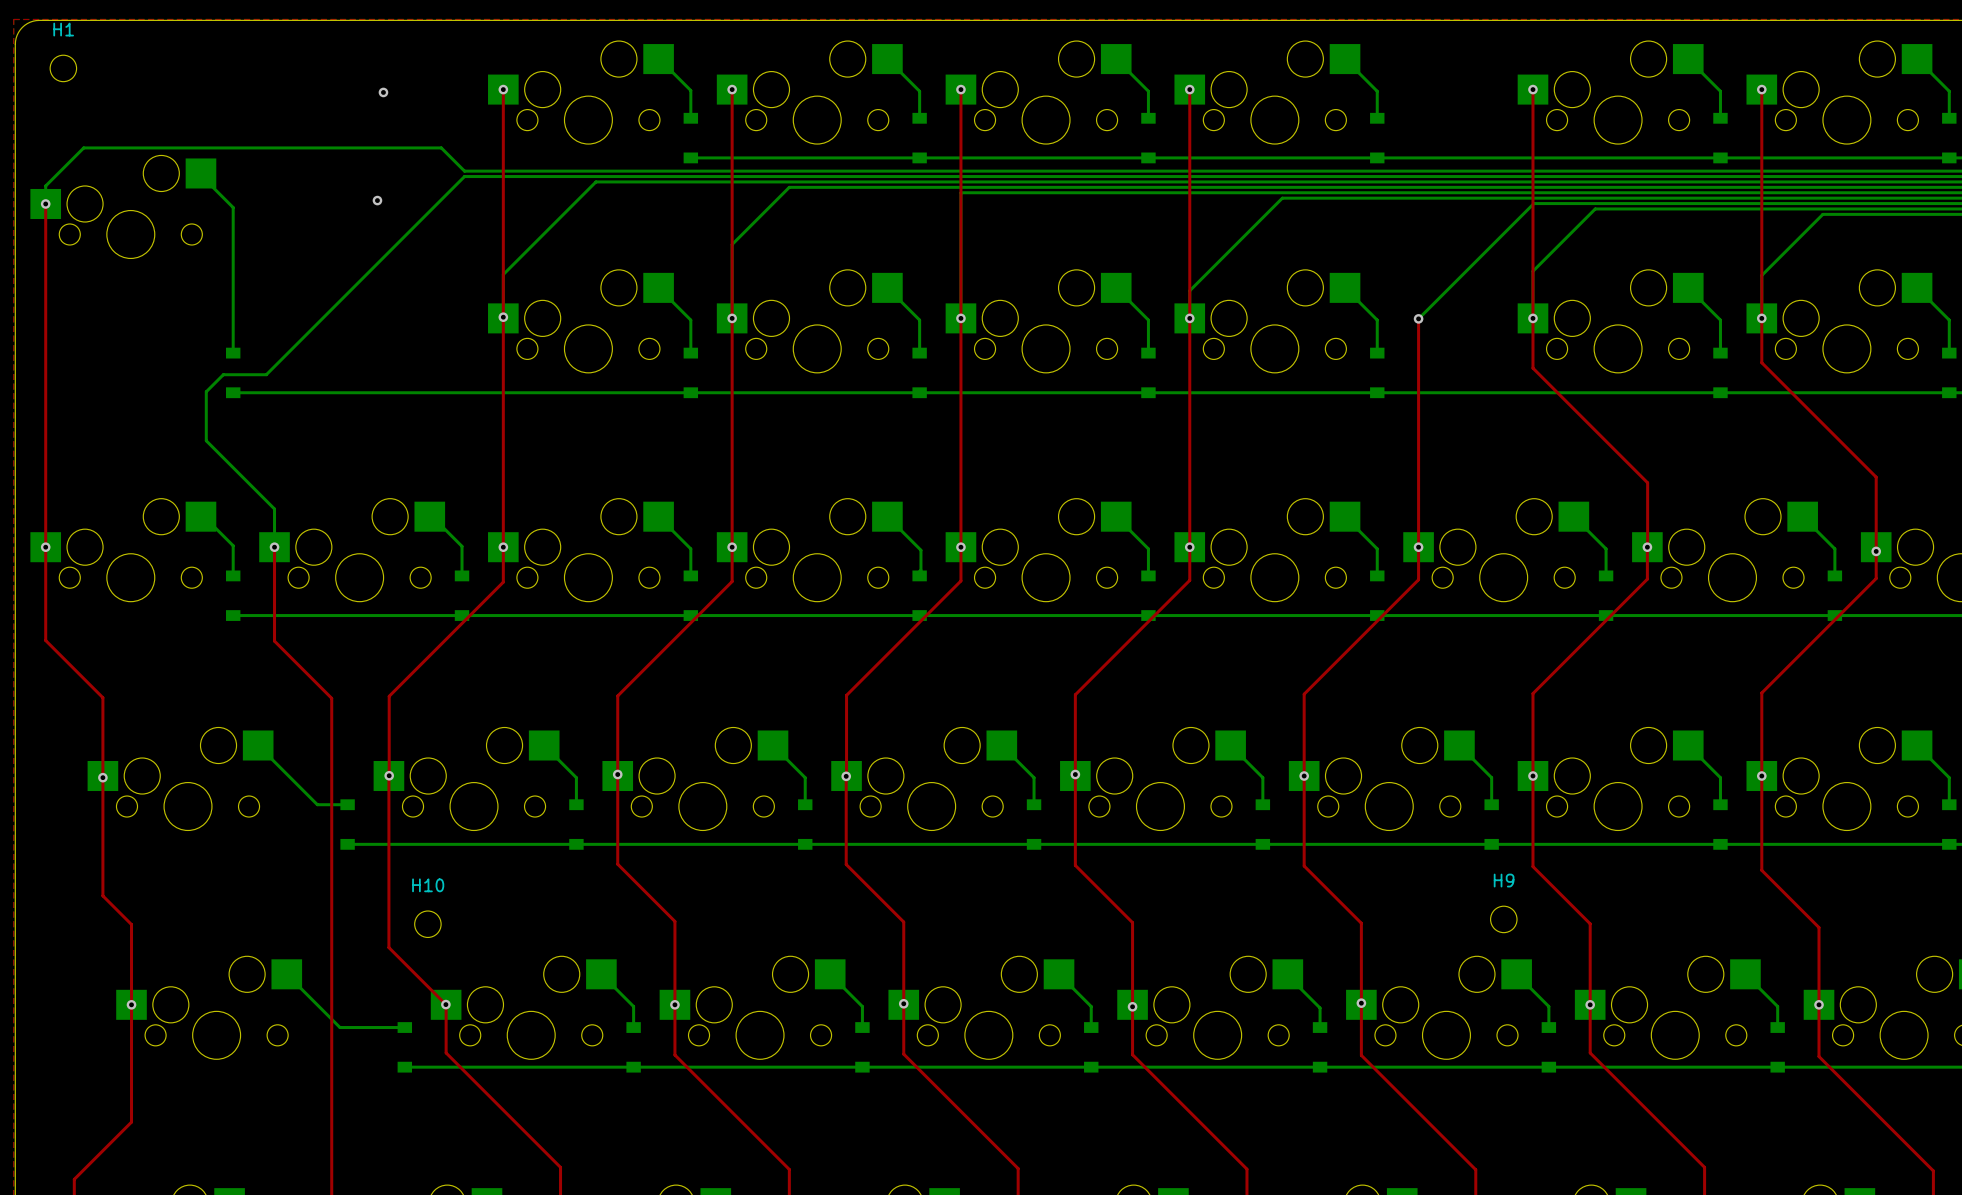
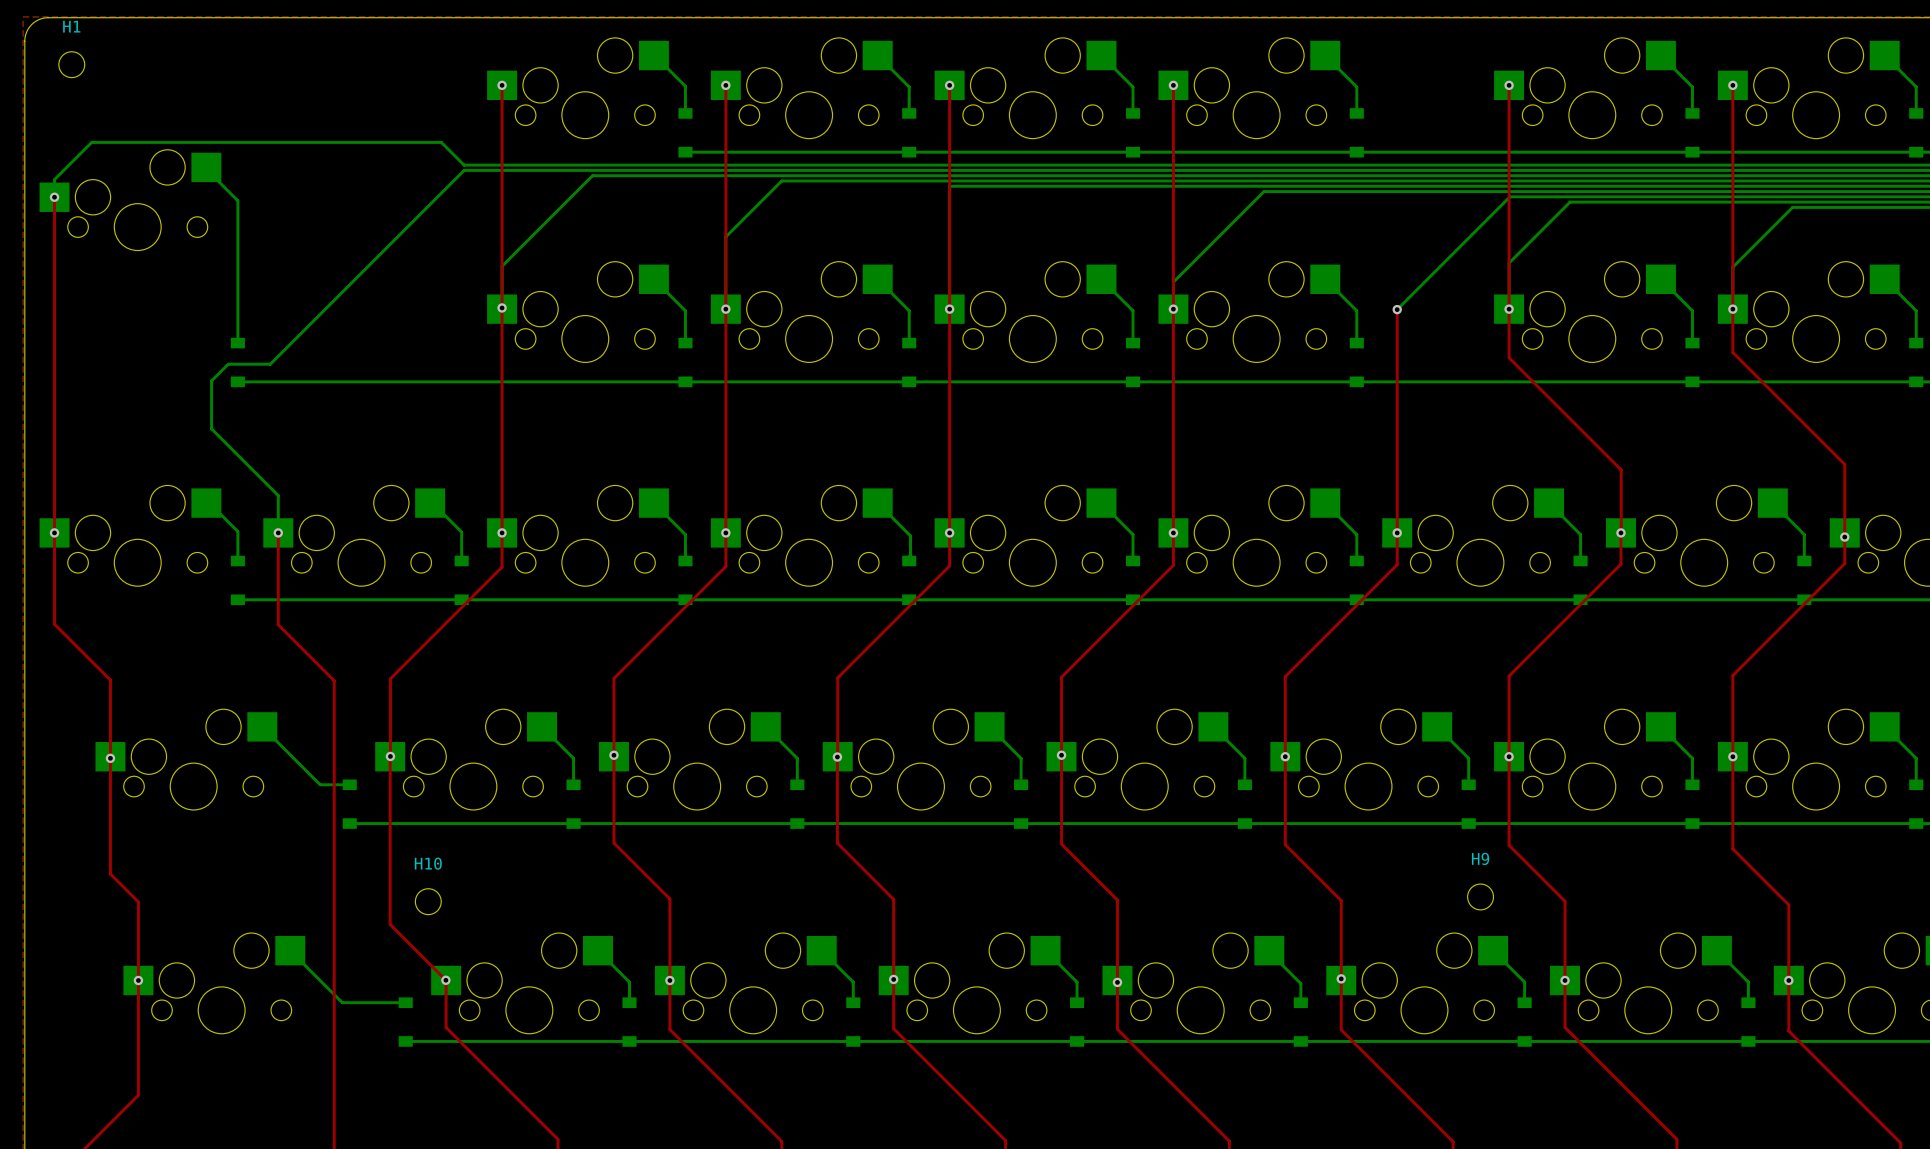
via: (383, 92) -> none
via: (377, 200) -> none

